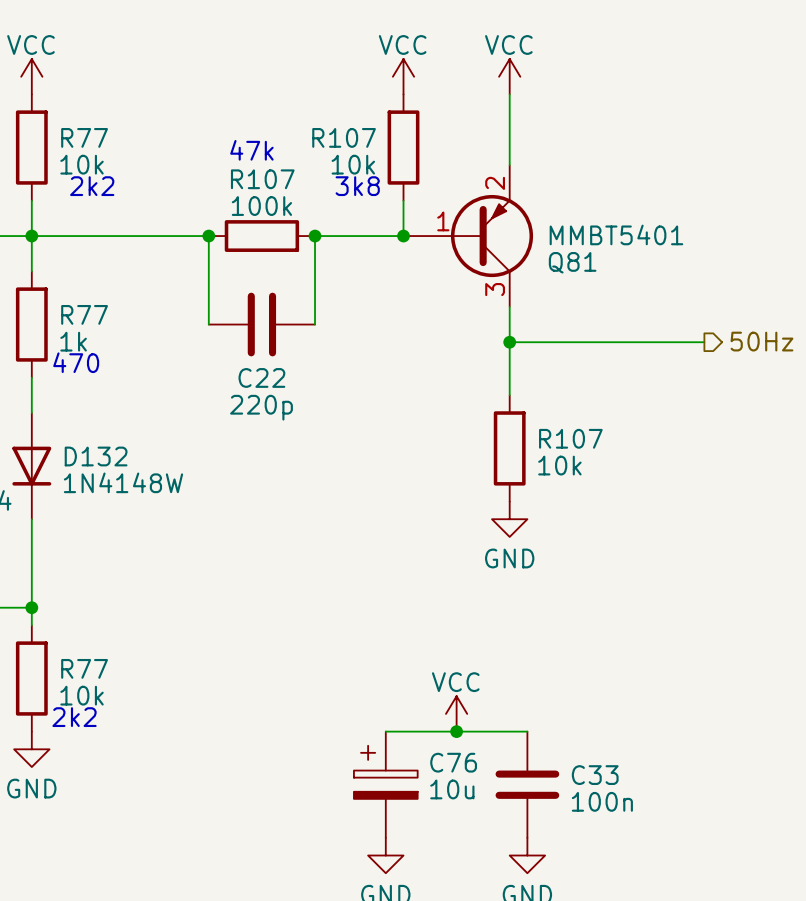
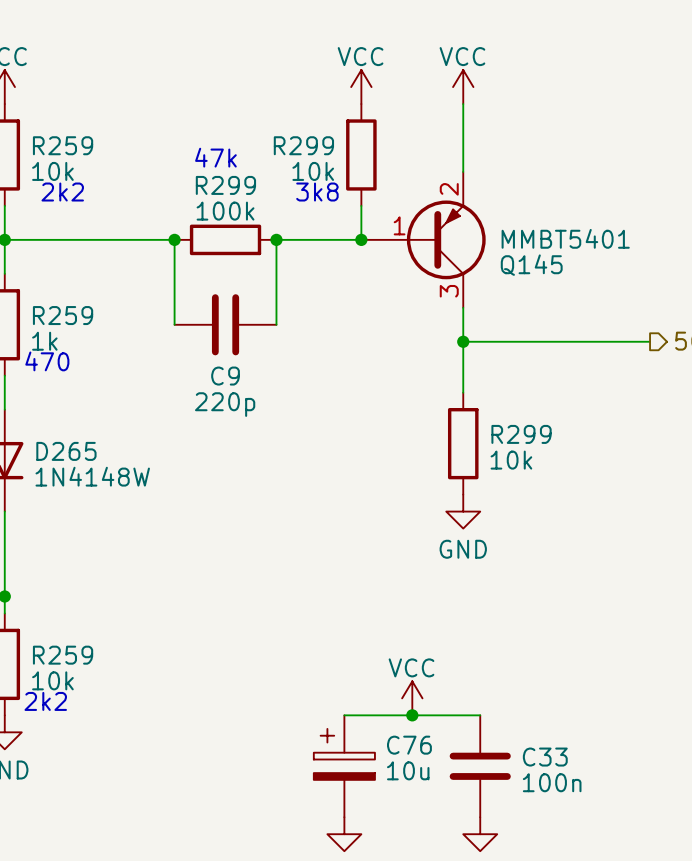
R77 name: R77 (84, 137) -> R259 (63, 145)
R107 name: R107 (344, 137) -> R299 (303, 145)
R107 name: R107 (262, 179) -> R299 (225, 185)
Q81 name: Q81 (572, 262) -> Q145 (531, 265)
R77 name: R77 (84, 314) -> R259 (63, 315)
C22 name: C22 (261, 377) -> C9 (225, 376)
R107 name: R107 (570, 438) -> R299 (521, 434)
D132 name: D132 (96, 456) -> D265 (66, 451)
R77 name: R77 (84, 668) -> R259 (63, 655)

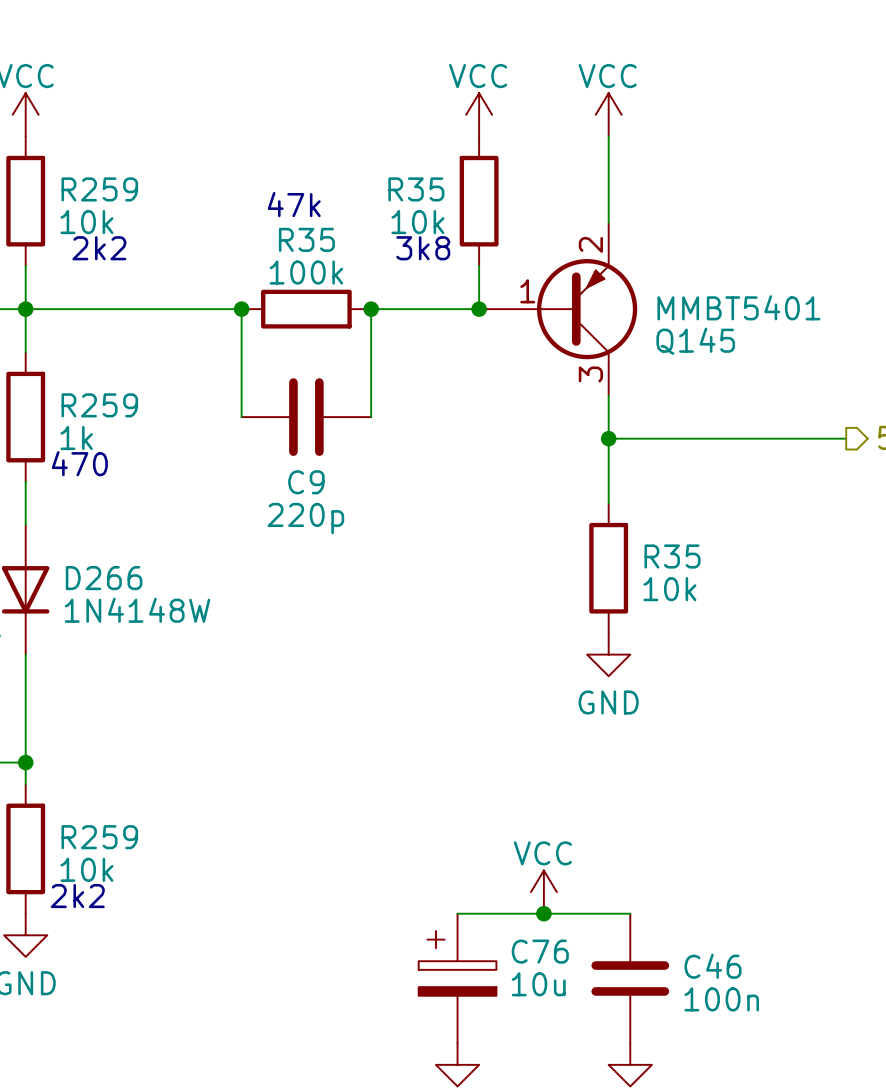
R299 name: R299 (303, 145) -> R35 (416, 189)
R299 name: R299 (225, 185) -> R35 (306, 239)
R299 name: R299 (521, 434) -> R35 (672, 556)
D265 name: D265 (66, 451) -> D266 (104, 578)
C33 name: C33 (545, 757) -> C46 (713, 966)

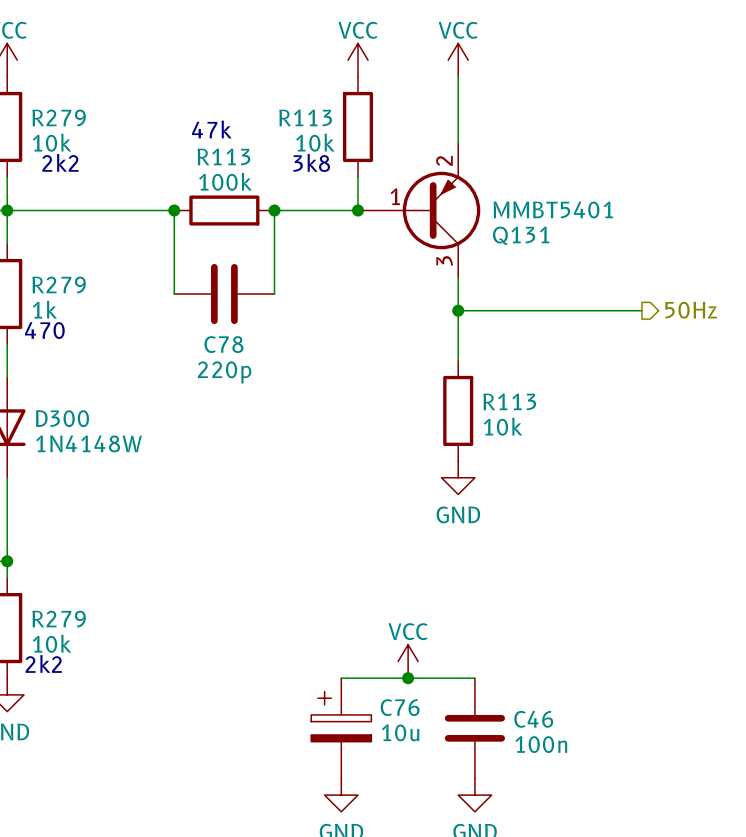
R259 name: R259 (99, 189) -> R279 (59, 118)
R35 name: R35 (416, 189) -> R113 (305, 117)
R35 name: R35 (306, 239) -> R113 (223, 156)
Q145 name: Q145 (695, 341) -> Q131 (521, 235)
R259 name: R259 (99, 405) -> R279 (59, 285)
C9 name: C9 (306, 482) -> C78 (223, 344)
R35 name: R35 (672, 556) -> R113 (509, 401)
D266 name: D266 (104, 578) -> D300 (62, 418)
R259 name: R259 (99, 837) -> R279 (59, 619)

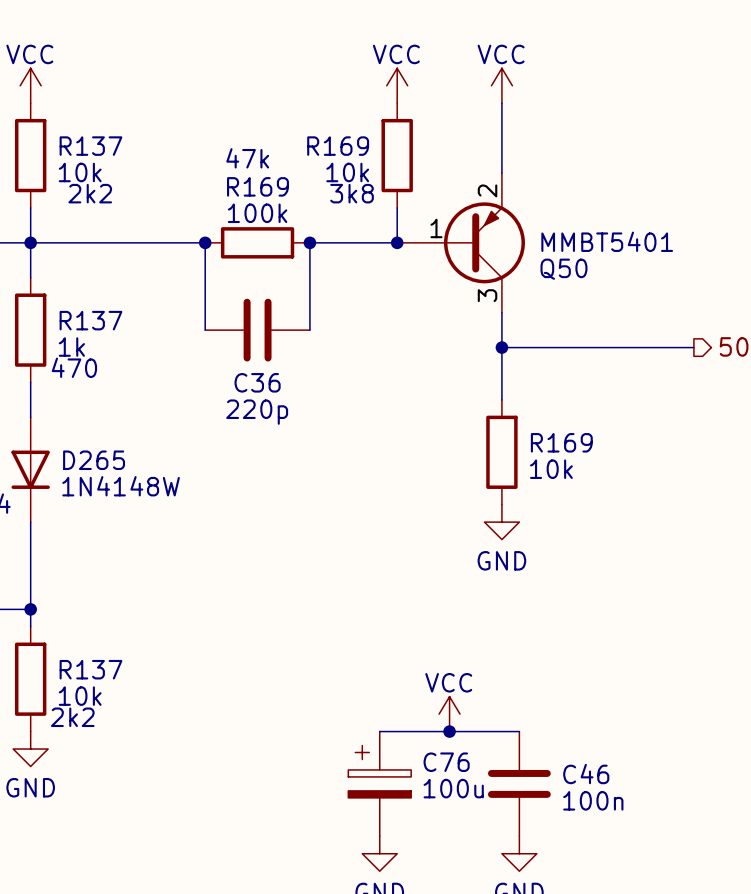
R113 name: R113 (305, 117) -> R169 (338, 146)
R279 name: R279 (59, 118) -> R137 (90, 146)
R113 name: R113 (223, 156) -> R169 (257, 186)
Q131 name: Q131 (521, 235) -> Q50 (563, 269)
R279 name: R279 (59, 285) -> R137 (90, 320)
C78 name: C78 (223, 344) -> C36 (257, 382)
R113 name: R113 (509, 401) -> R169 (561, 442)
D300 name: D300 (62, 418) -> D265 (94, 460)
R279 name: R279 (59, 619) -> R137 (90, 669)
C76 value: 10u (400, 732) -> 100u (453, 788)

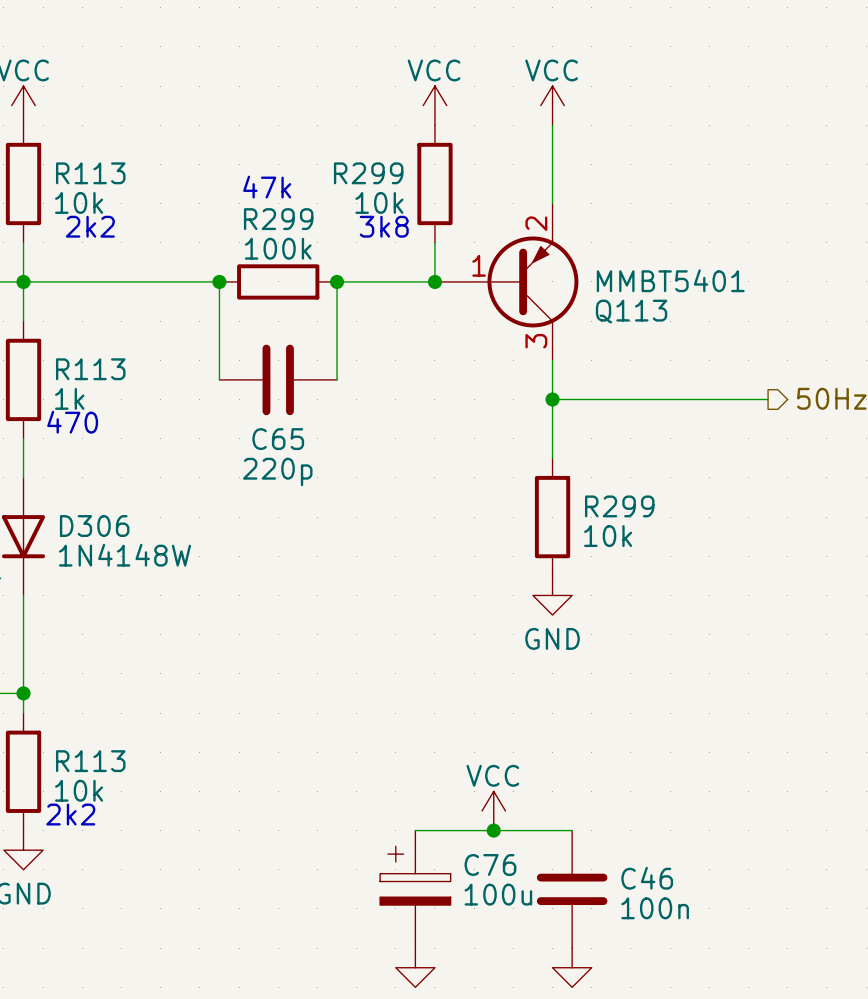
R137 name: R137 (90, 146) -> R113 (90, 173)
R169 name: R169 (338, 146) -> R299 (368, 173)
R169 name: R169 (257, 186) -> R299 (278, 219)
Q50 name: Q50 (563, 269) -> Q113 (631, 311)
R137 name: R137 (90, 320) -> R113 (90, 369)
C36 name: C36 (257, 382) -> C65 (278, 439)
R169 name: R169 (561, 442) -> R299 (619, 506)
D265 name: D265 (94, 460) -> D306 (94, 526)
R137 name: R137 (90, 669) -> R113 (90, 761)

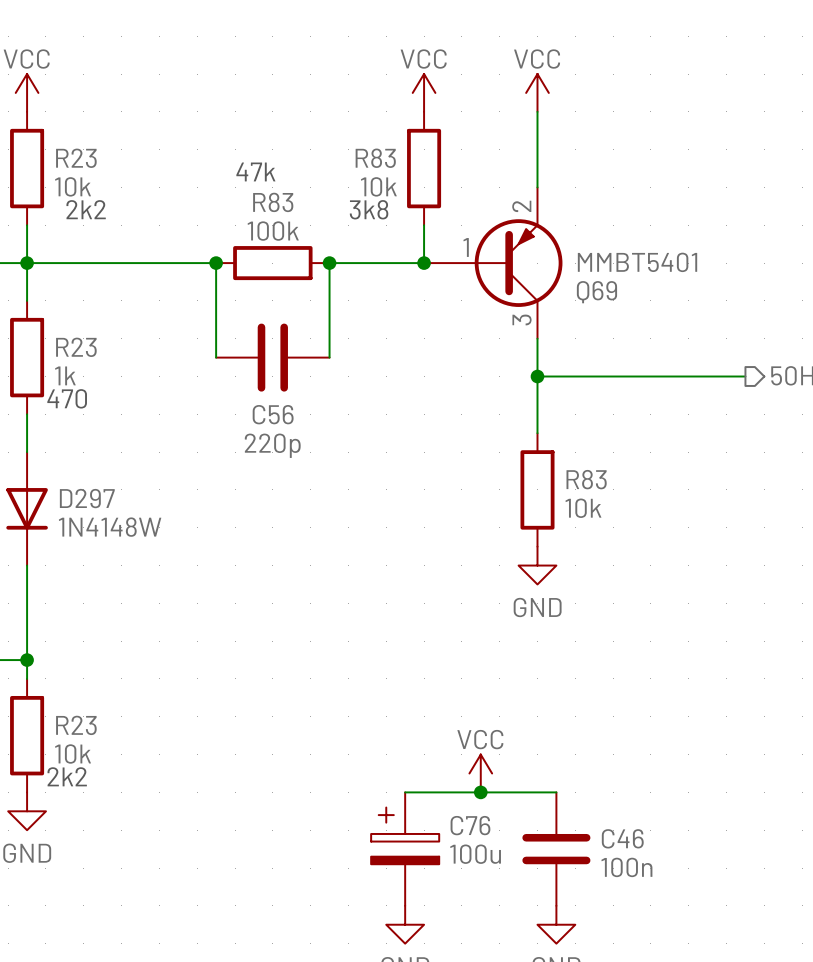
R113 name: R113 (90, 173) -> R23 (76, 158)
R299 name: R299 (368, 173) -> R83 (375, 158)
R299 name: R299 (278, 219) -> R83 (273, 202)
Q113 name: Q113 (631, 311) -> Q69 (596, 292)
R113 name: R113 (90, 369) -> R23 (76, 347)
C65 name: C65 (278, 439) -> C56 (273, 414)
R299 name: R299 (619, 506) -> R83 (586, 479)
D306 name: D306 (94, 526) -> D297 (87, 498)
R113 name: R113 (90, 761) -> R23 (76, 725)

